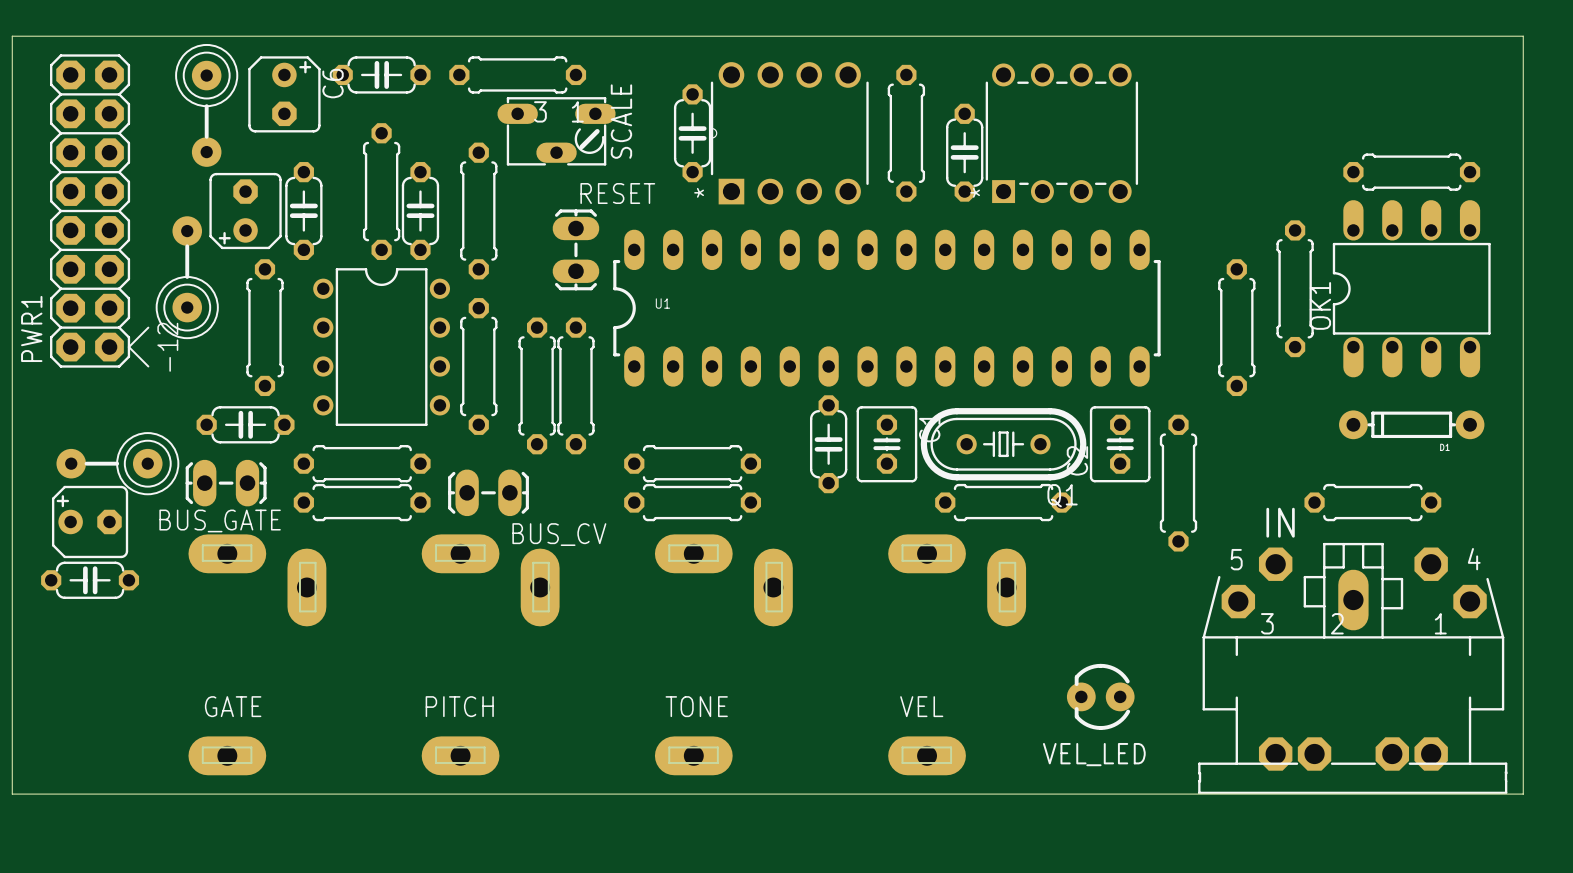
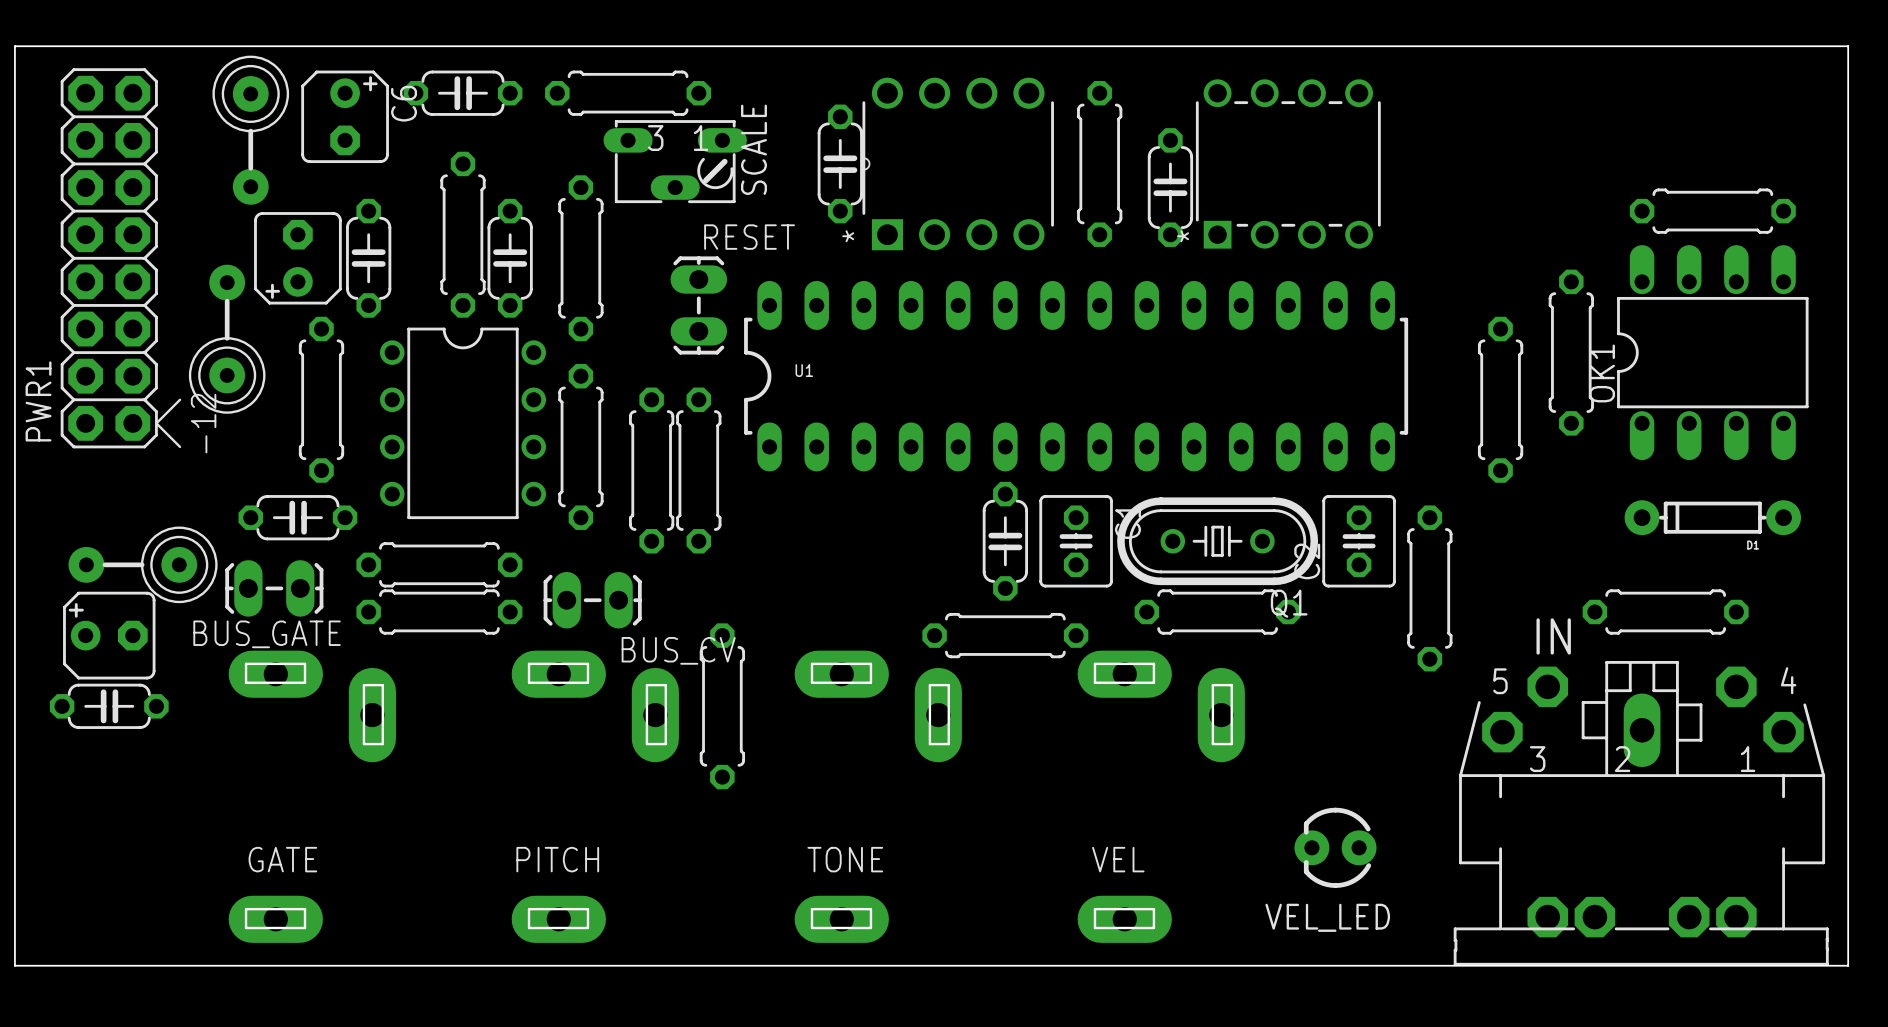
part: (692, 463) -> none
part: (692, 502) -> none
part: none -> (1005, 635)
part: none -> (722, 706)

